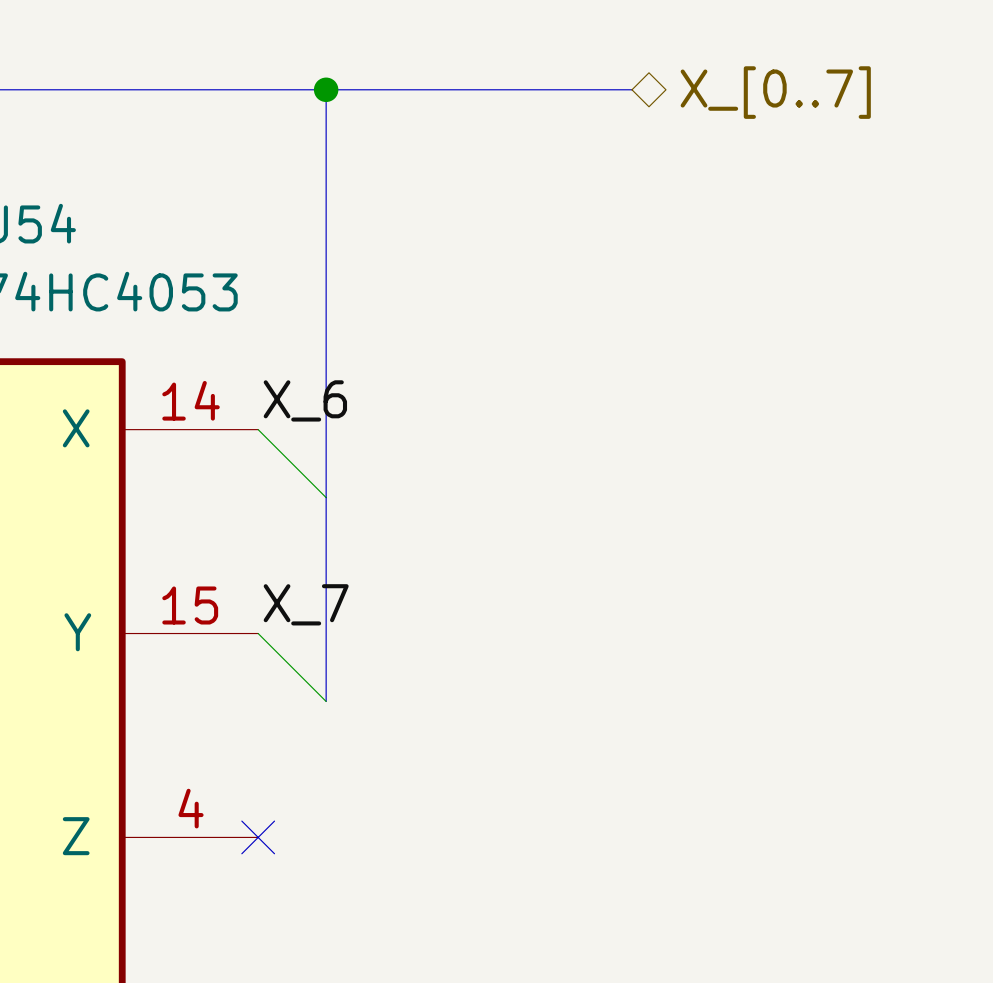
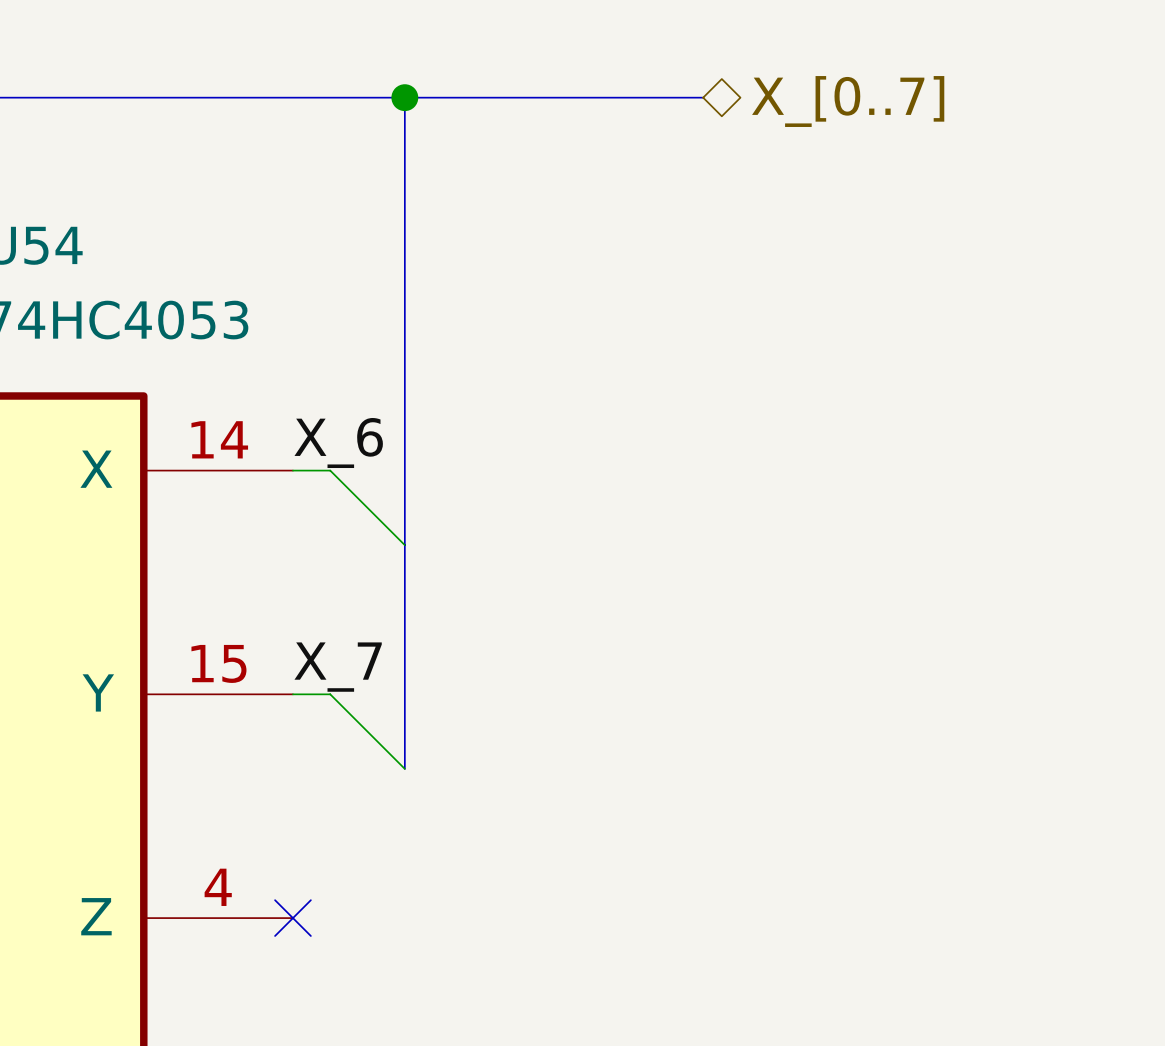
bus: (326, 89) (326, 701) -> (404, 97) (404, 768)
junction position: (326, 89) -> (404, 97)
wire: (258, 429) (326, 497) -> (292, 470) (330, 470) (404, 545)
wire: (258, 633) (326, 701) -> (292, 694) (330, 694) (404, 768)

